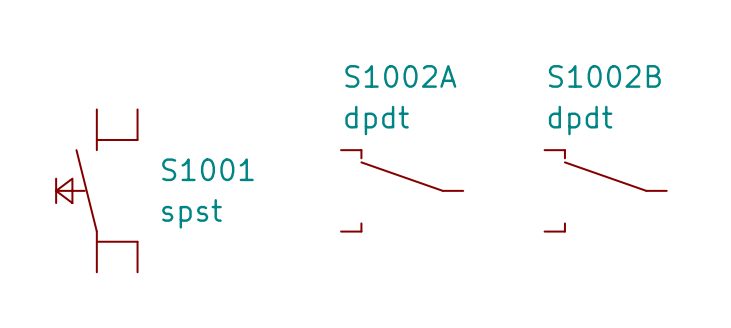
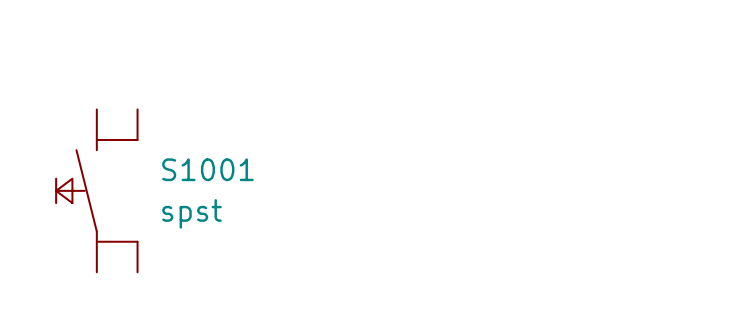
S1002A: dpdt (402, 190) -> none
S1002B: dpdt (605, 190) -> none

